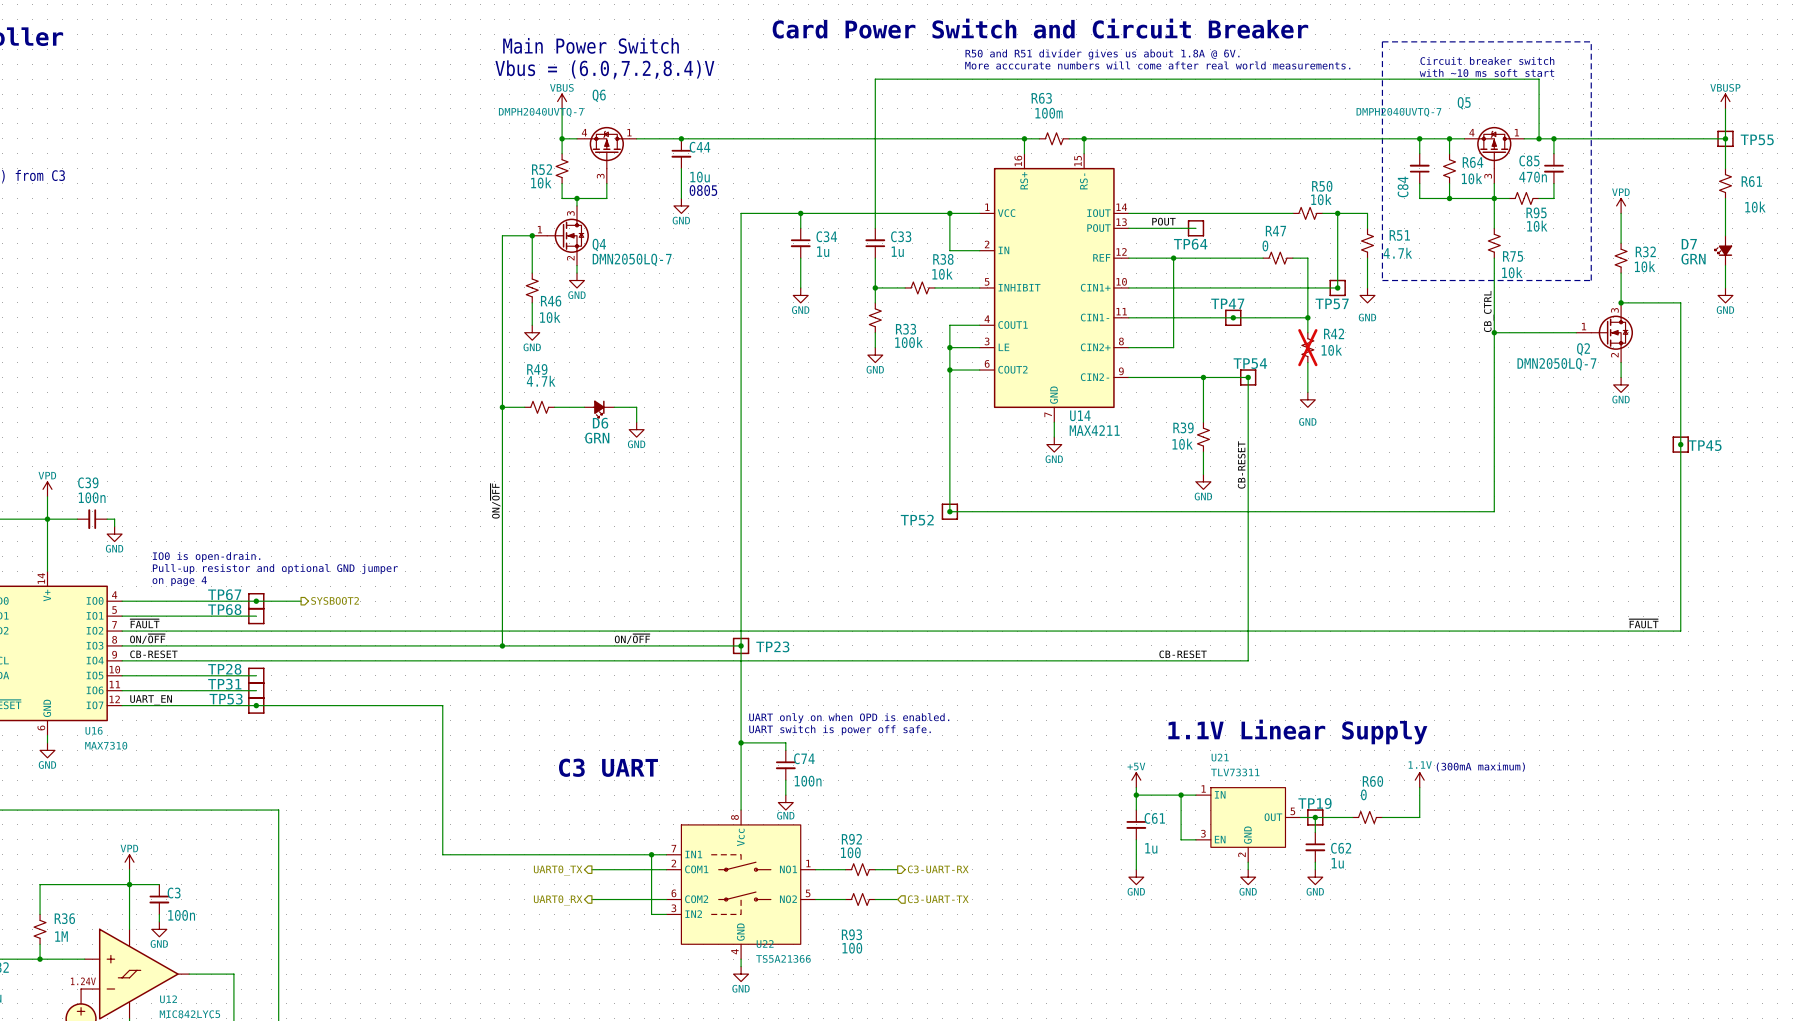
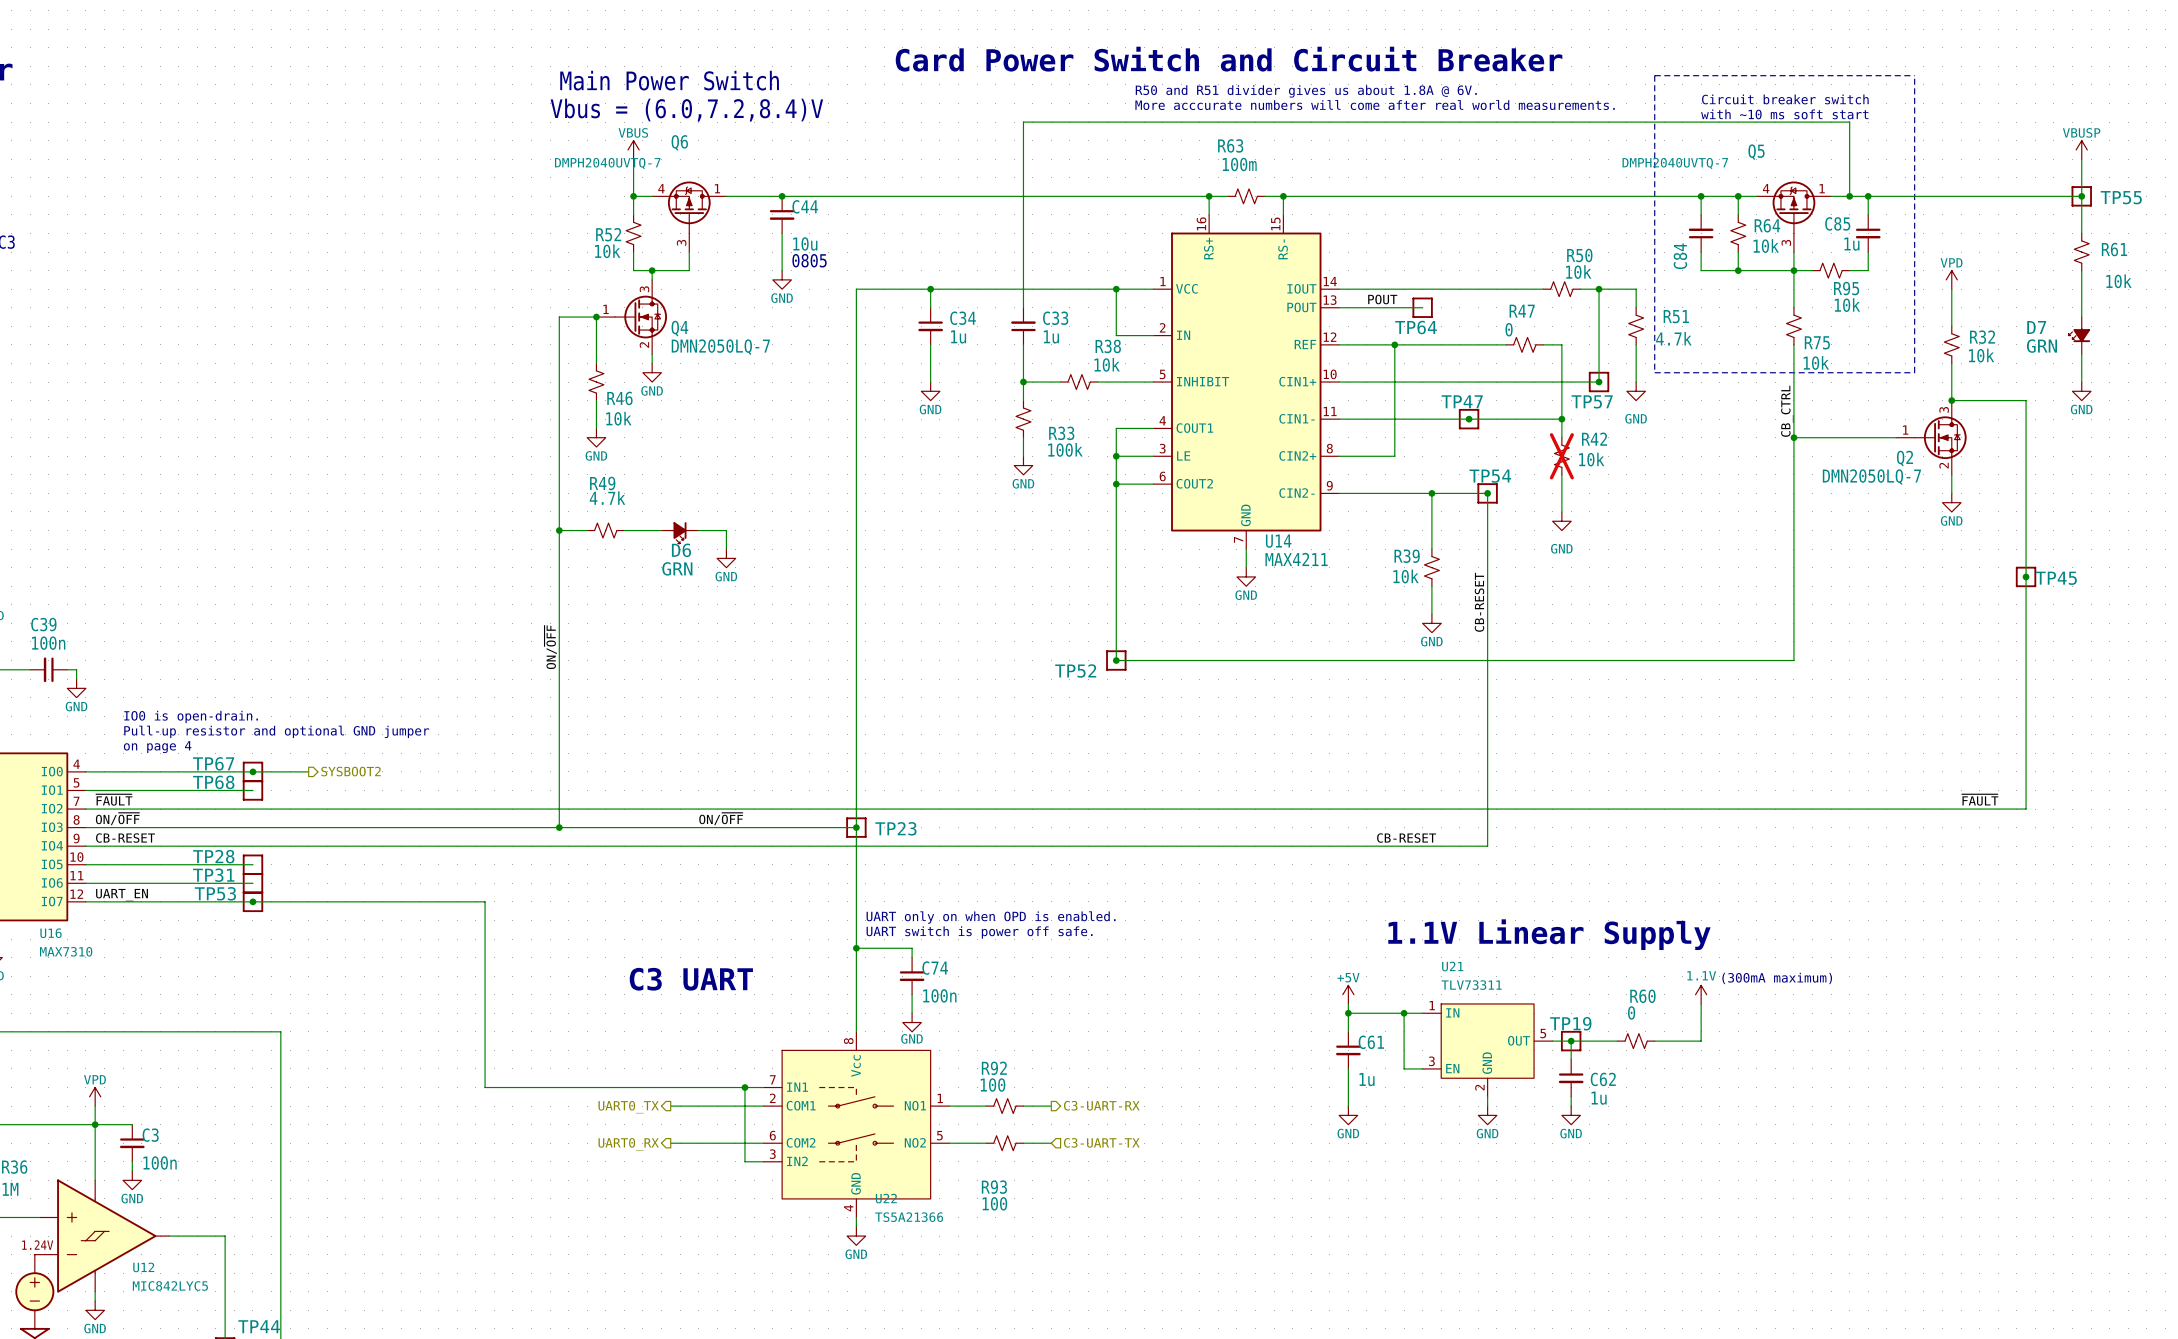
C85 value: 470n (1533, 177) -> 1u (1851, 244)

